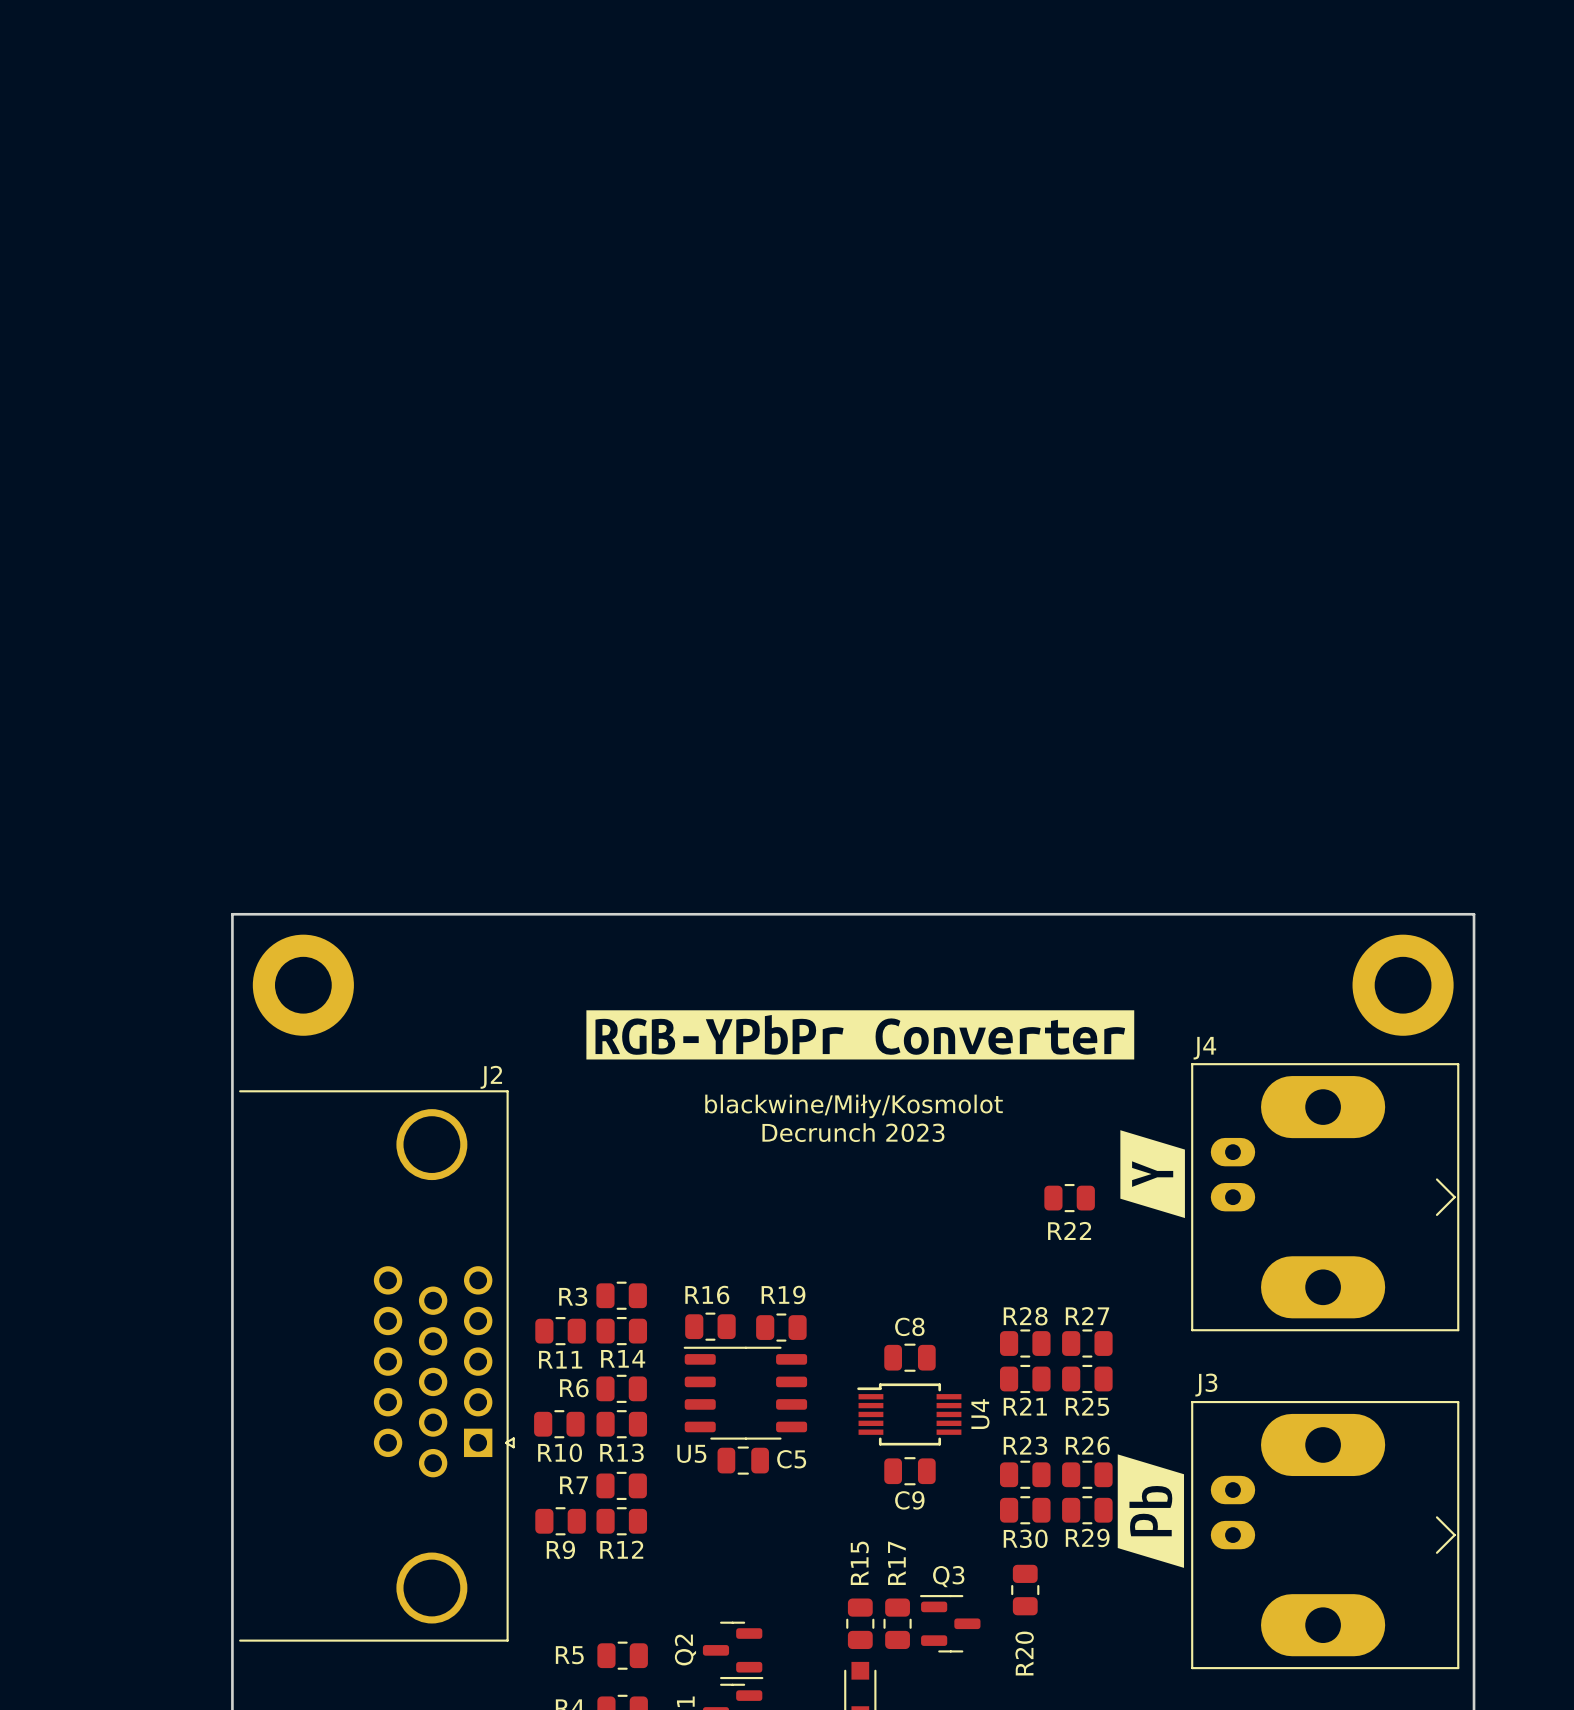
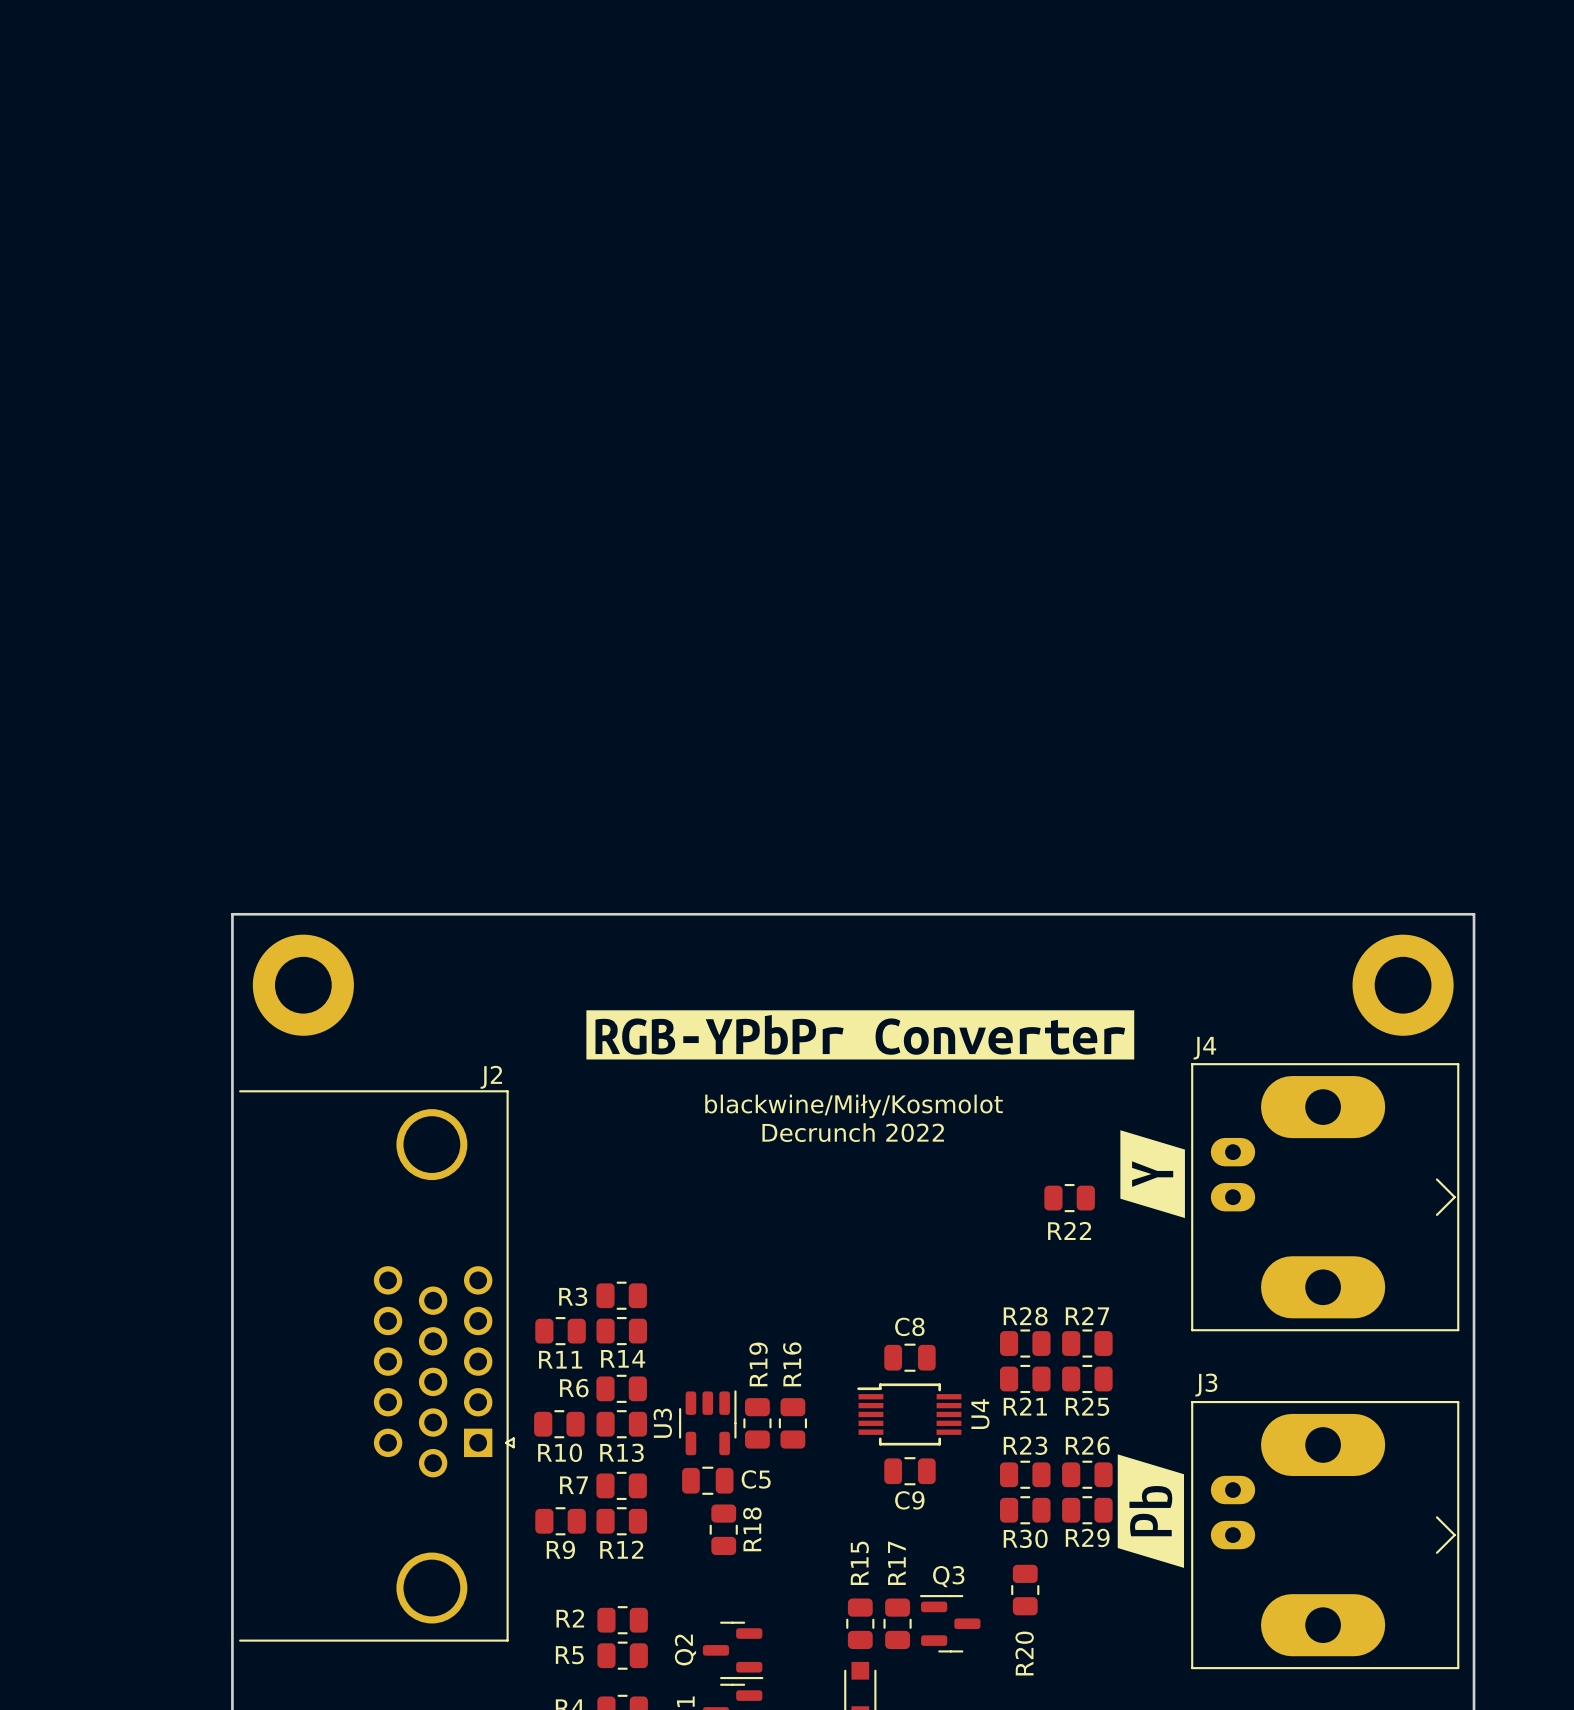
text: Decrunch 2023 (853, 1132) -> Decrunch 2022 (853, 1132)
R16 rotation: 0° (710, 1326) -> 90° clockwise (792, 1423)
R16 position: (710, 1326) -> (792, 1423)
R19 rotation: 0° (781, 1327) -> 90° clockwise (757, 1423)
R19 position: (781, 1327) -> (757, 1423)
U5: (745, 1393) -> none
U3: none -> (707, 1422)
C5 position: (743, 1460) -> (707, 1480)
R18: none -> (723, 1529)
R2: none -> (622, 1620)

